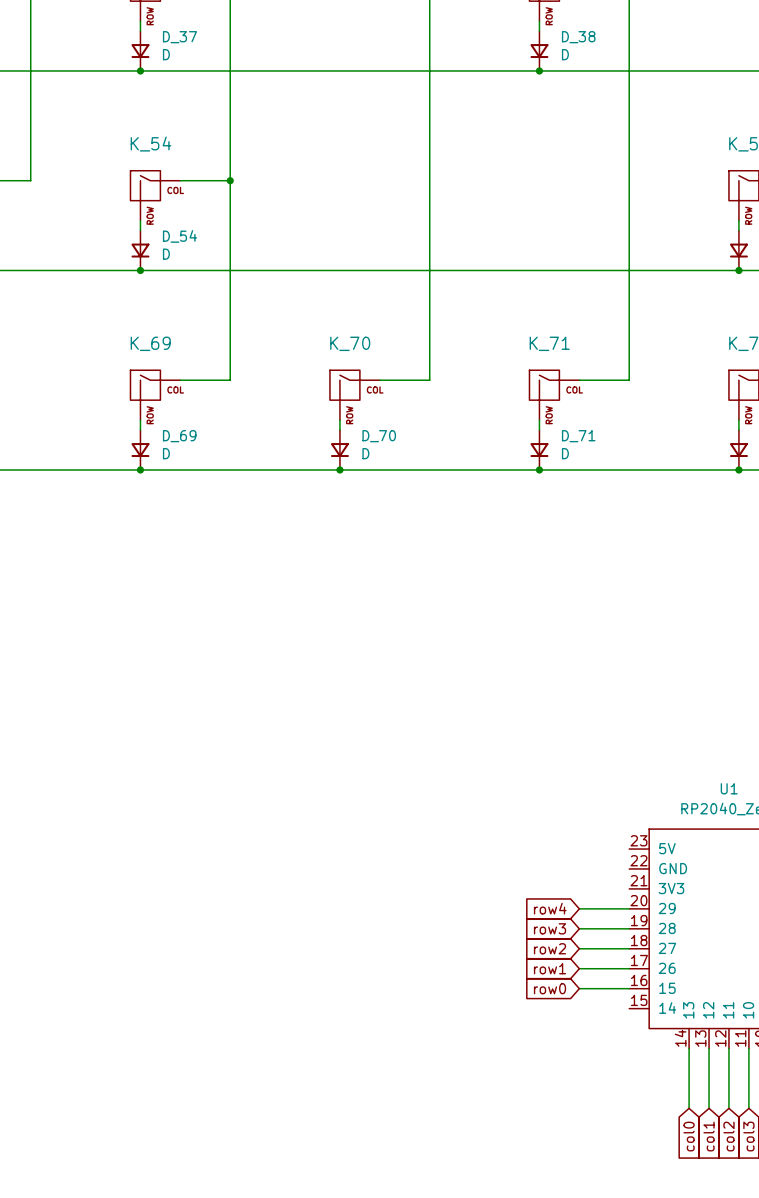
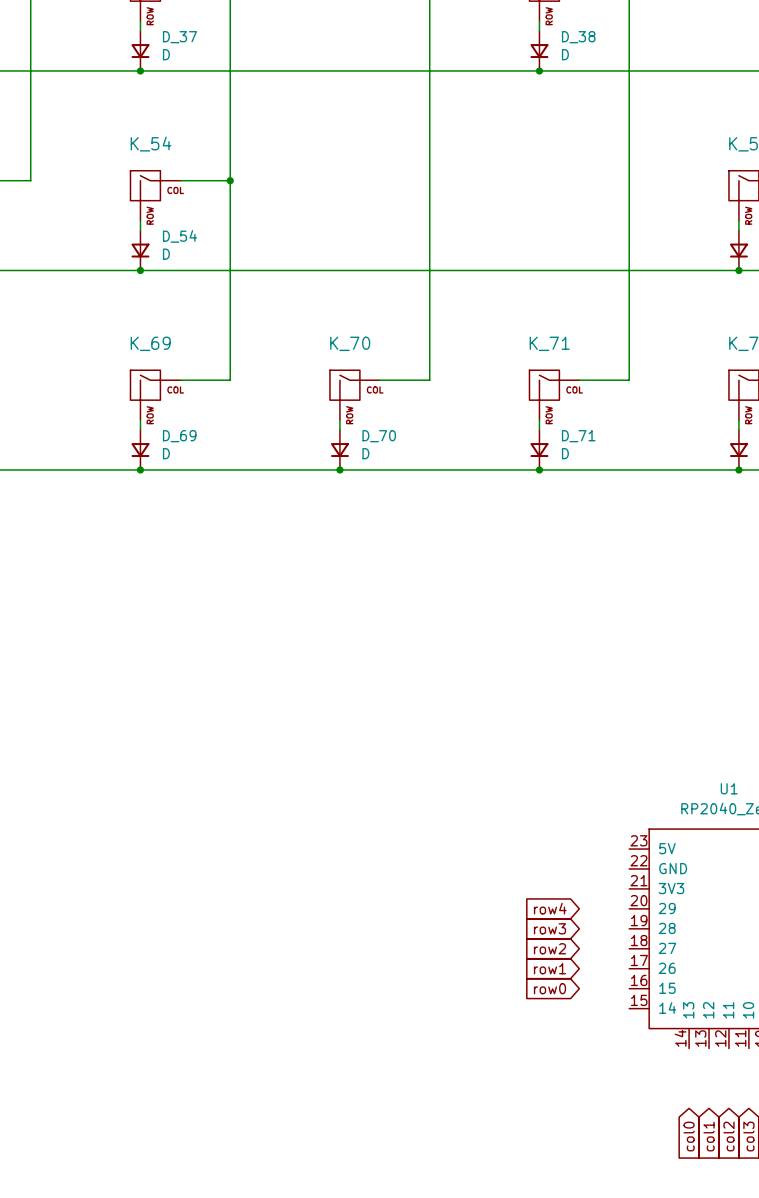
wire: (579, 908) (629, 908) -> none
wire: (579, 928) (629, 928) -> none
wire: (579, 948) (629, 948) -> none
wire: (579, 968) (629, 968) -> none
wire: (579, 988) (629, 988) -> none
wire: (689, 1048) (689, 1108) -> none
wire: (709, 1048) (709, 1108) -> none
wire: (728, 1048) (728, 1108) -> none
wire: (748, 1048) (748, 1108) -> none

